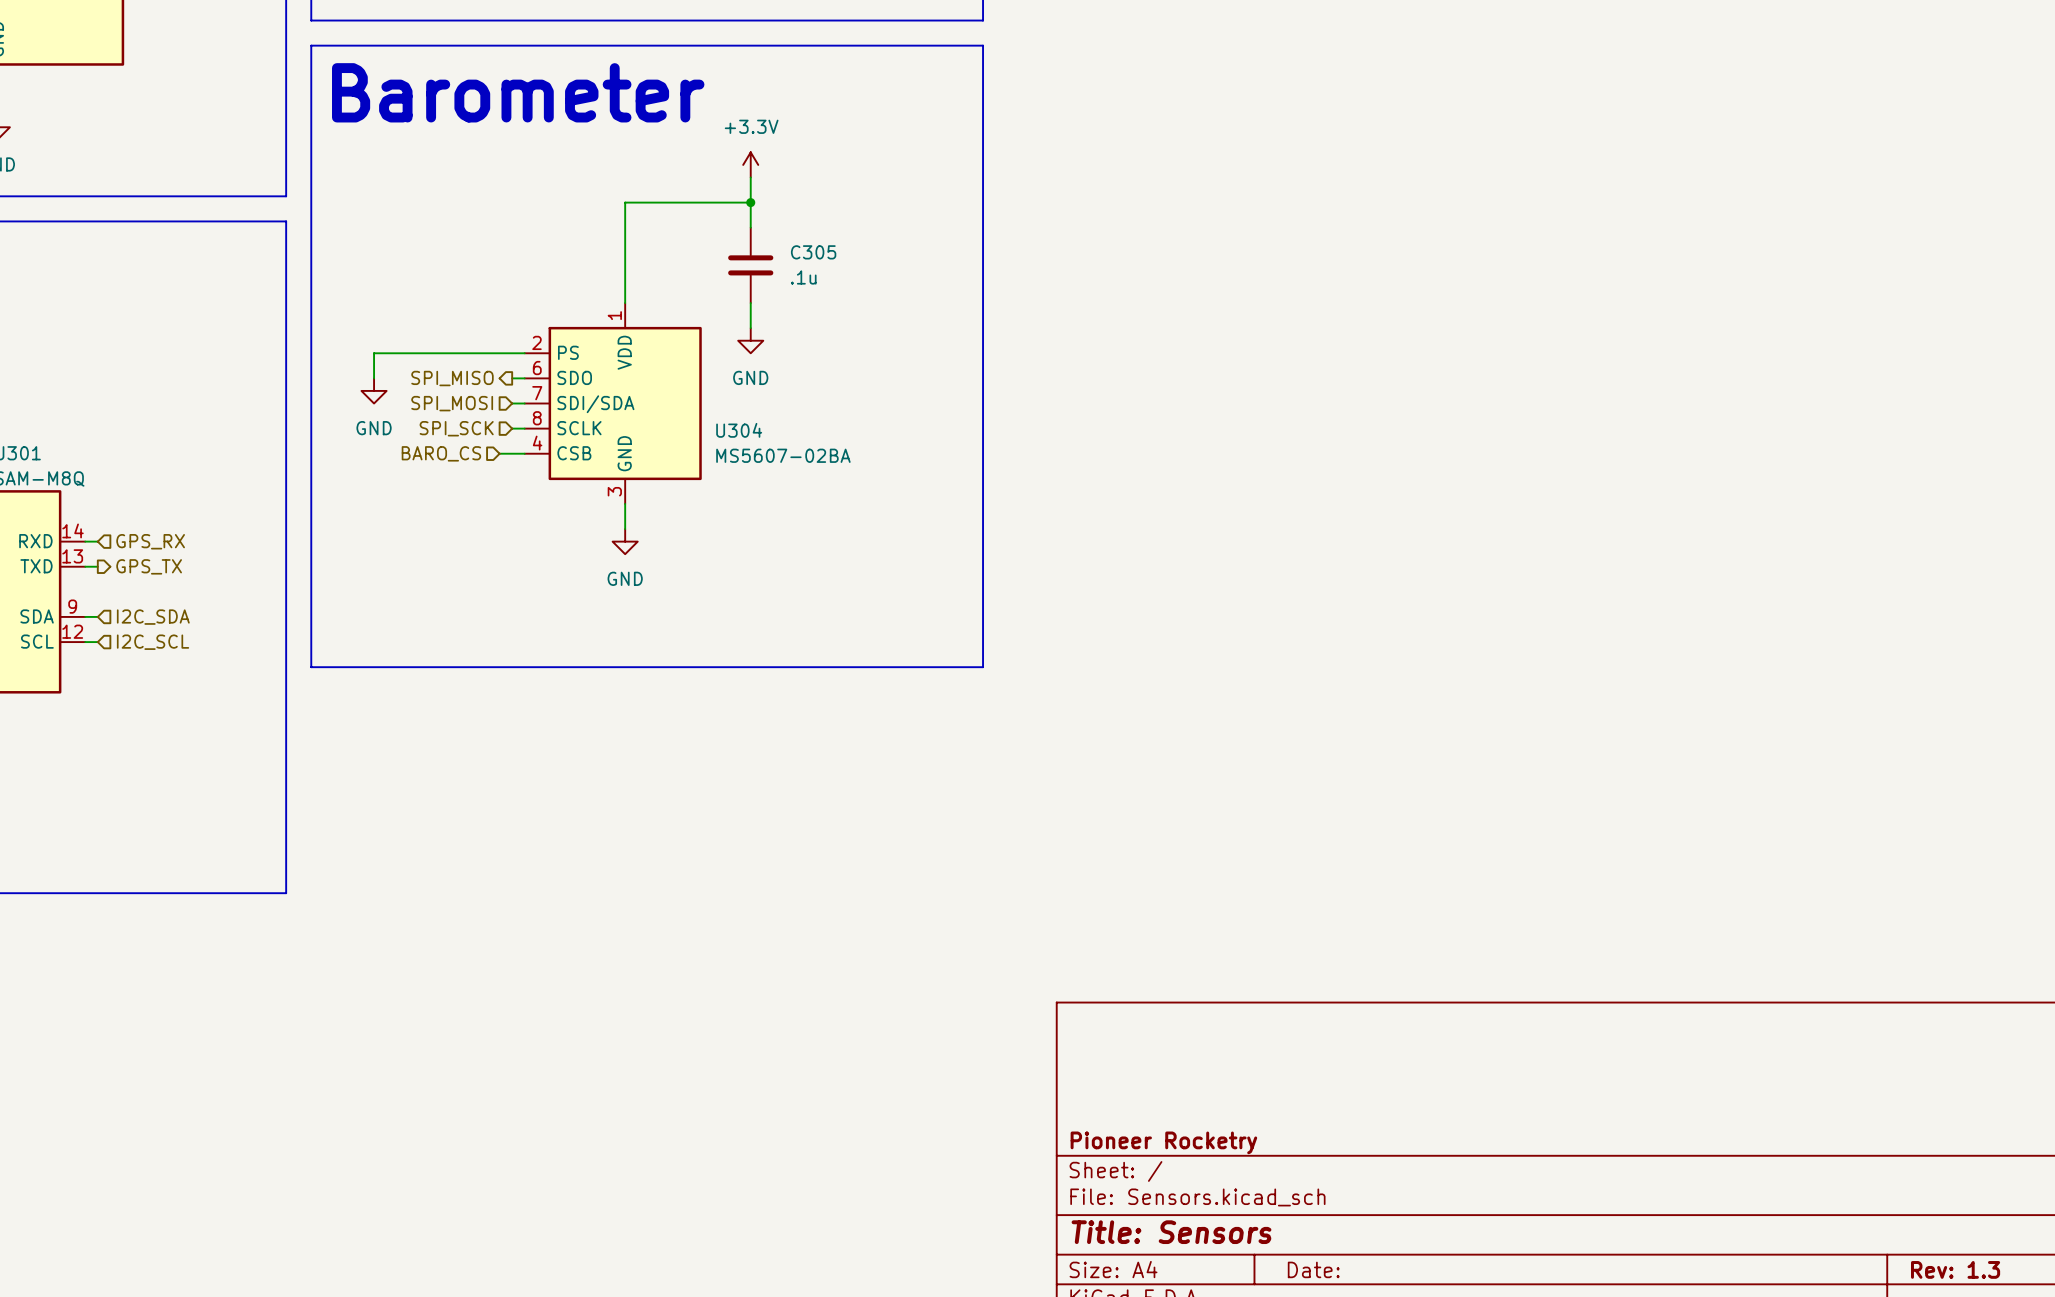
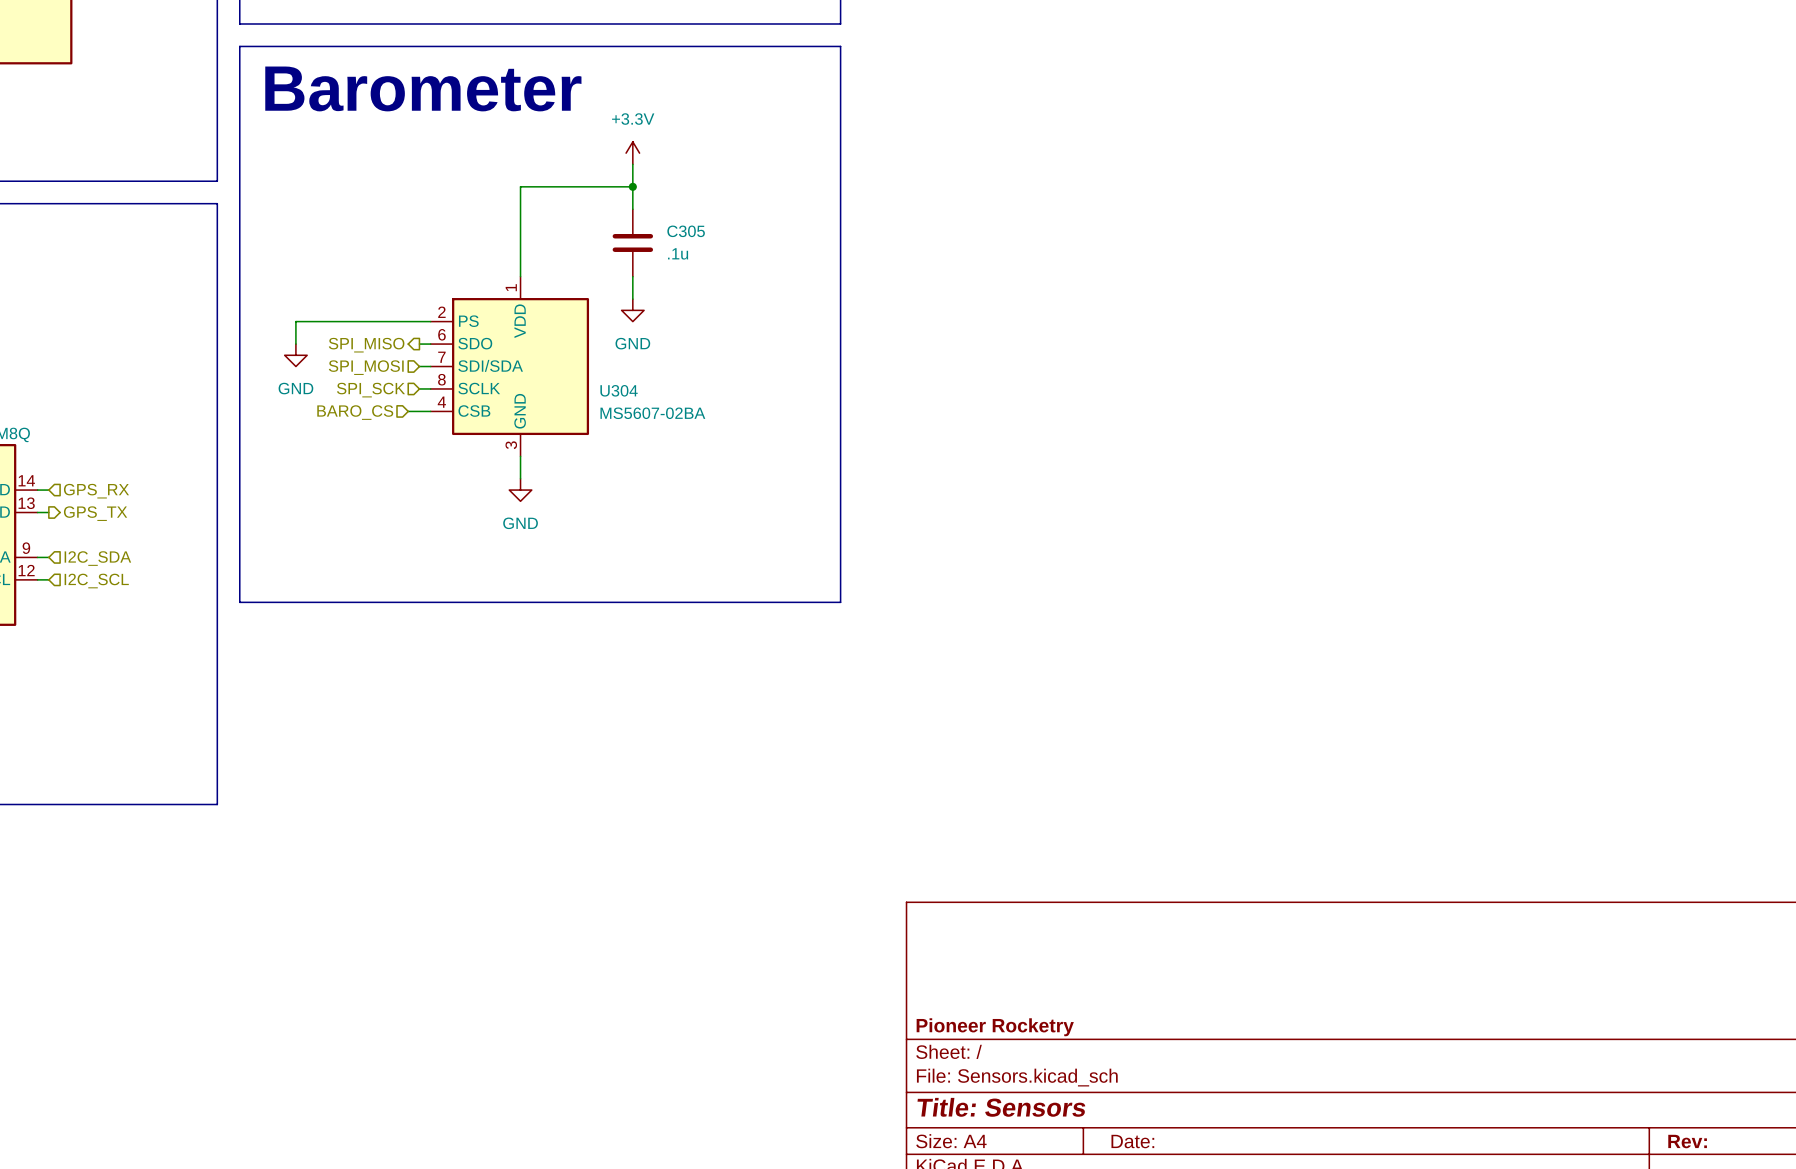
title block: Rev: 1.3 (1955, 1269) -> Rev: (1687, 1141)

